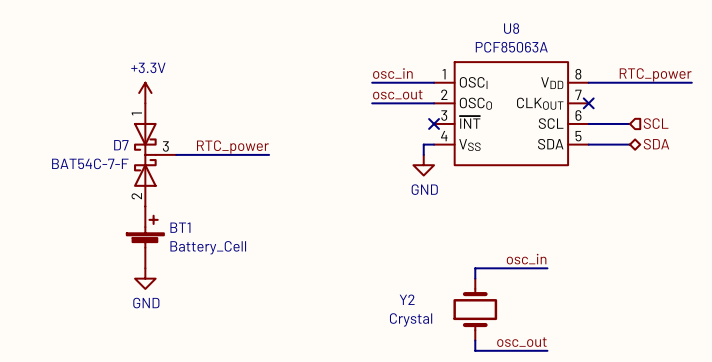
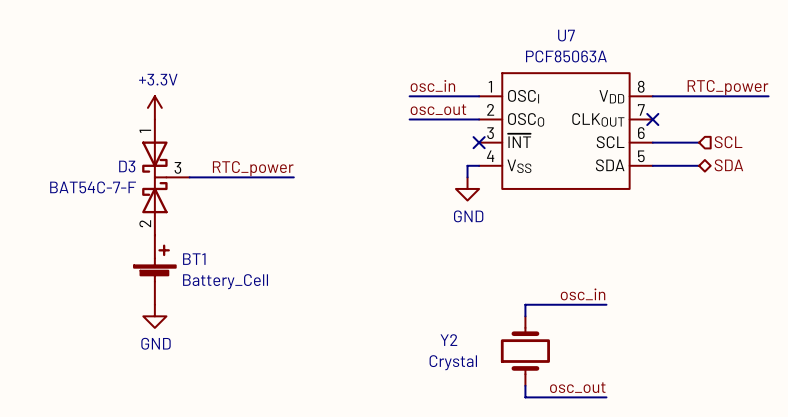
U8 name: U8 (511, 28) -> U7 (566, 35)
D7 name: D7 (121, 145) -> D3 (127, 166)

